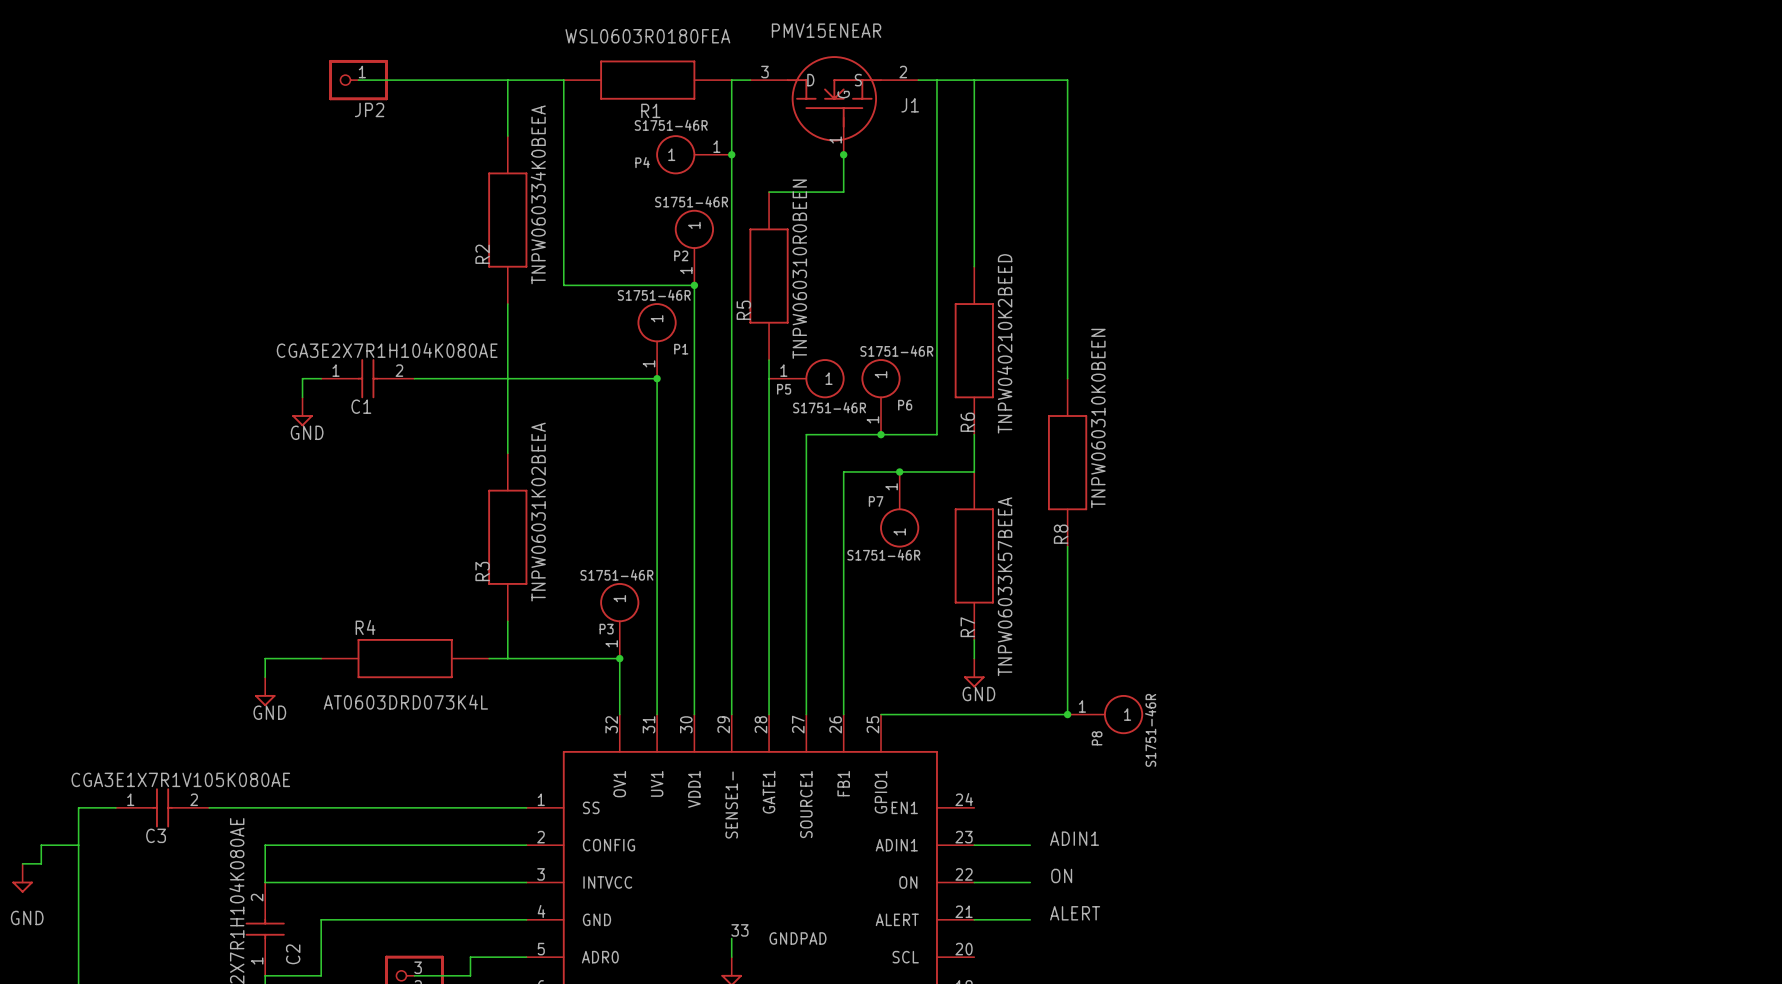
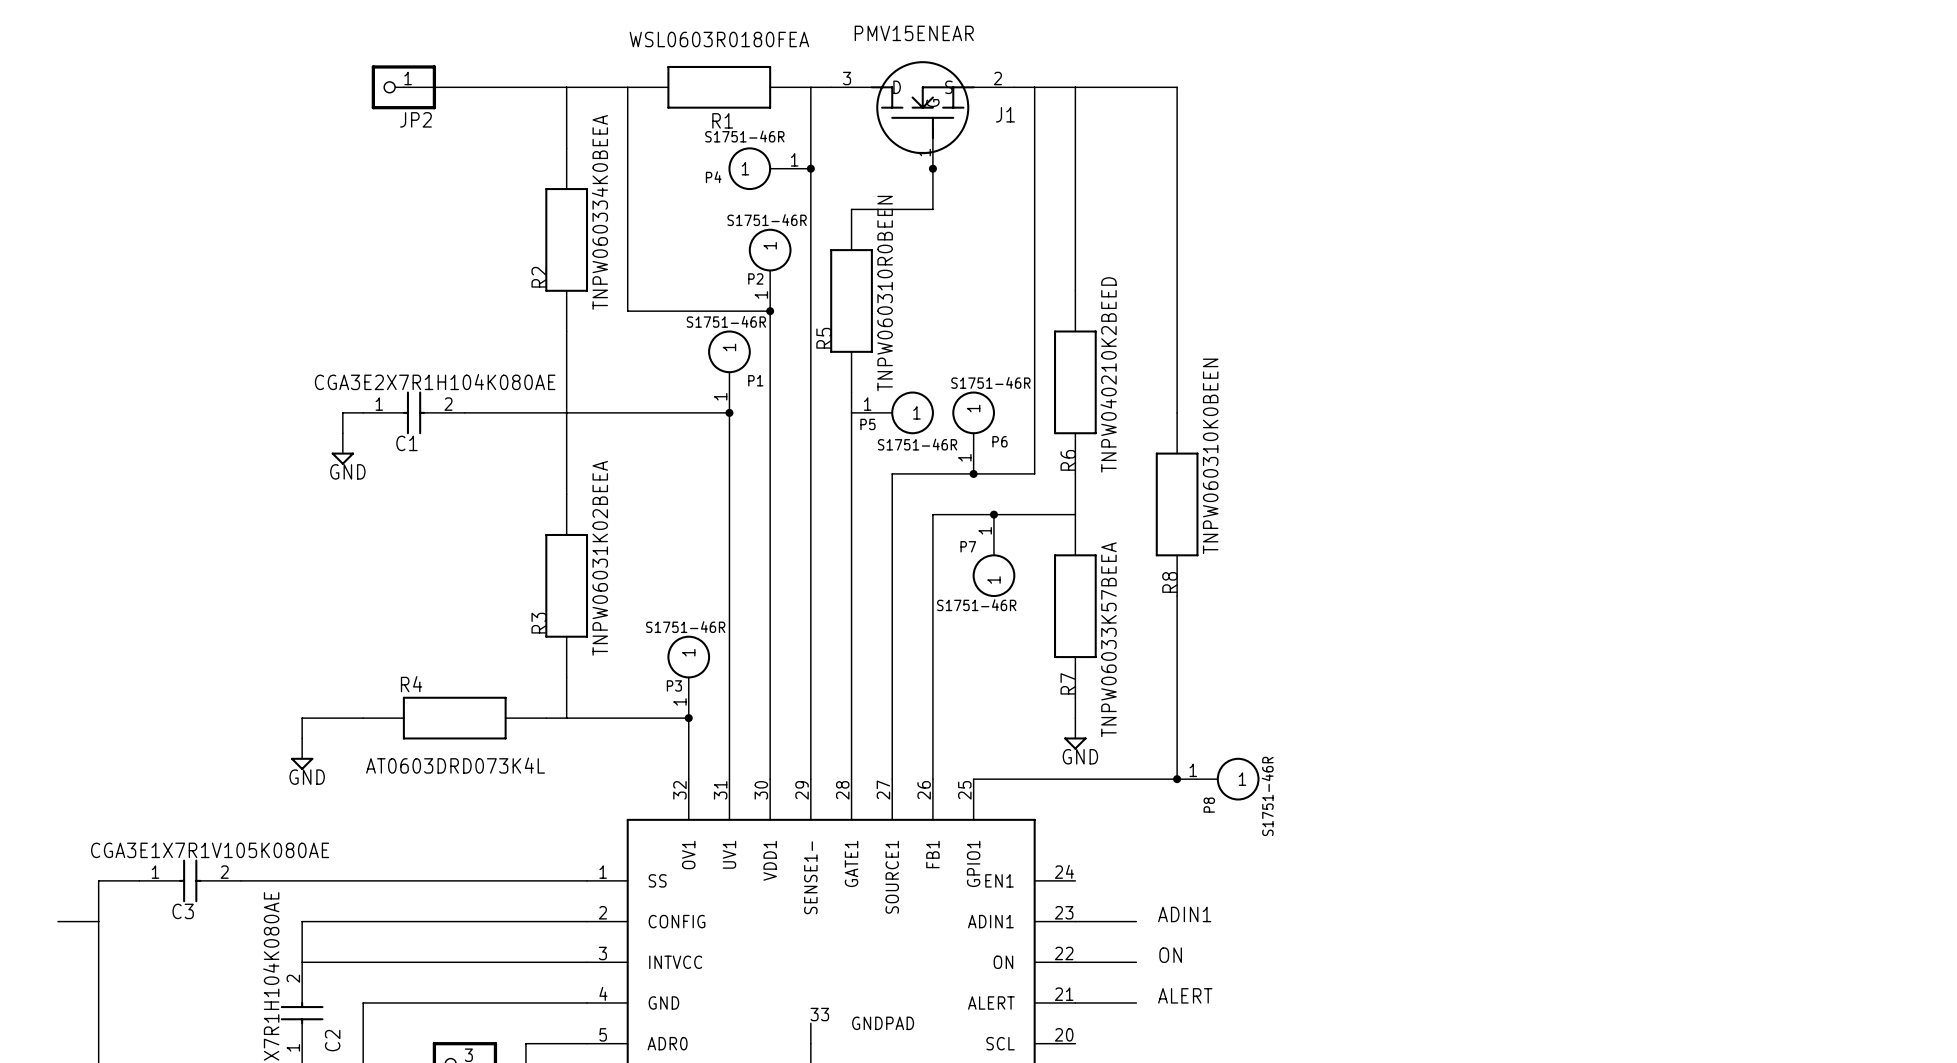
wire: (41, 845) (41, 863) (22, 863) -> none
power symbol: GND (22, 878) -> none

